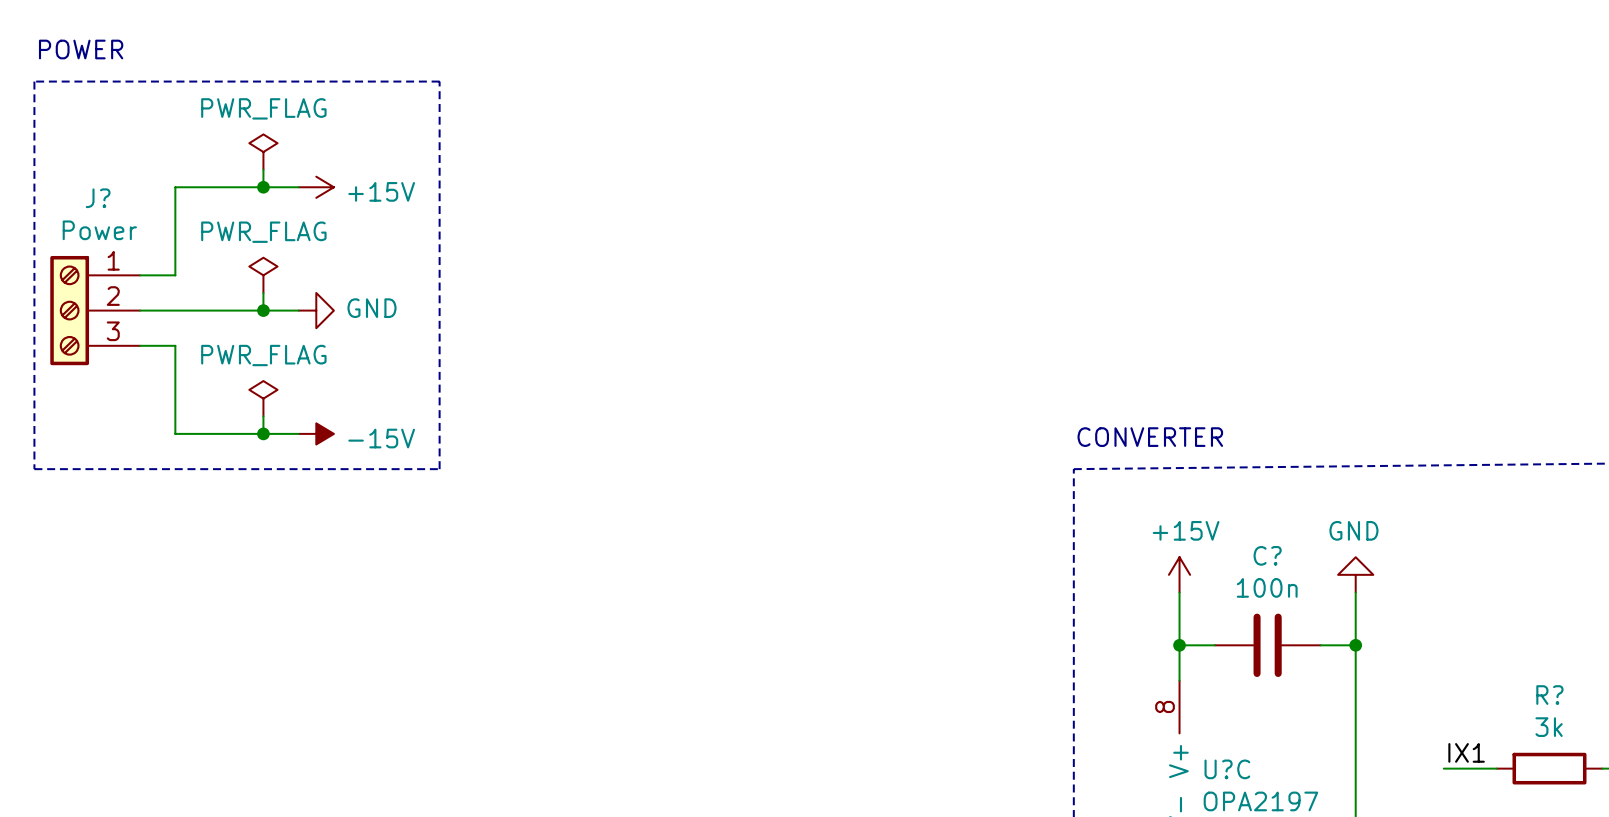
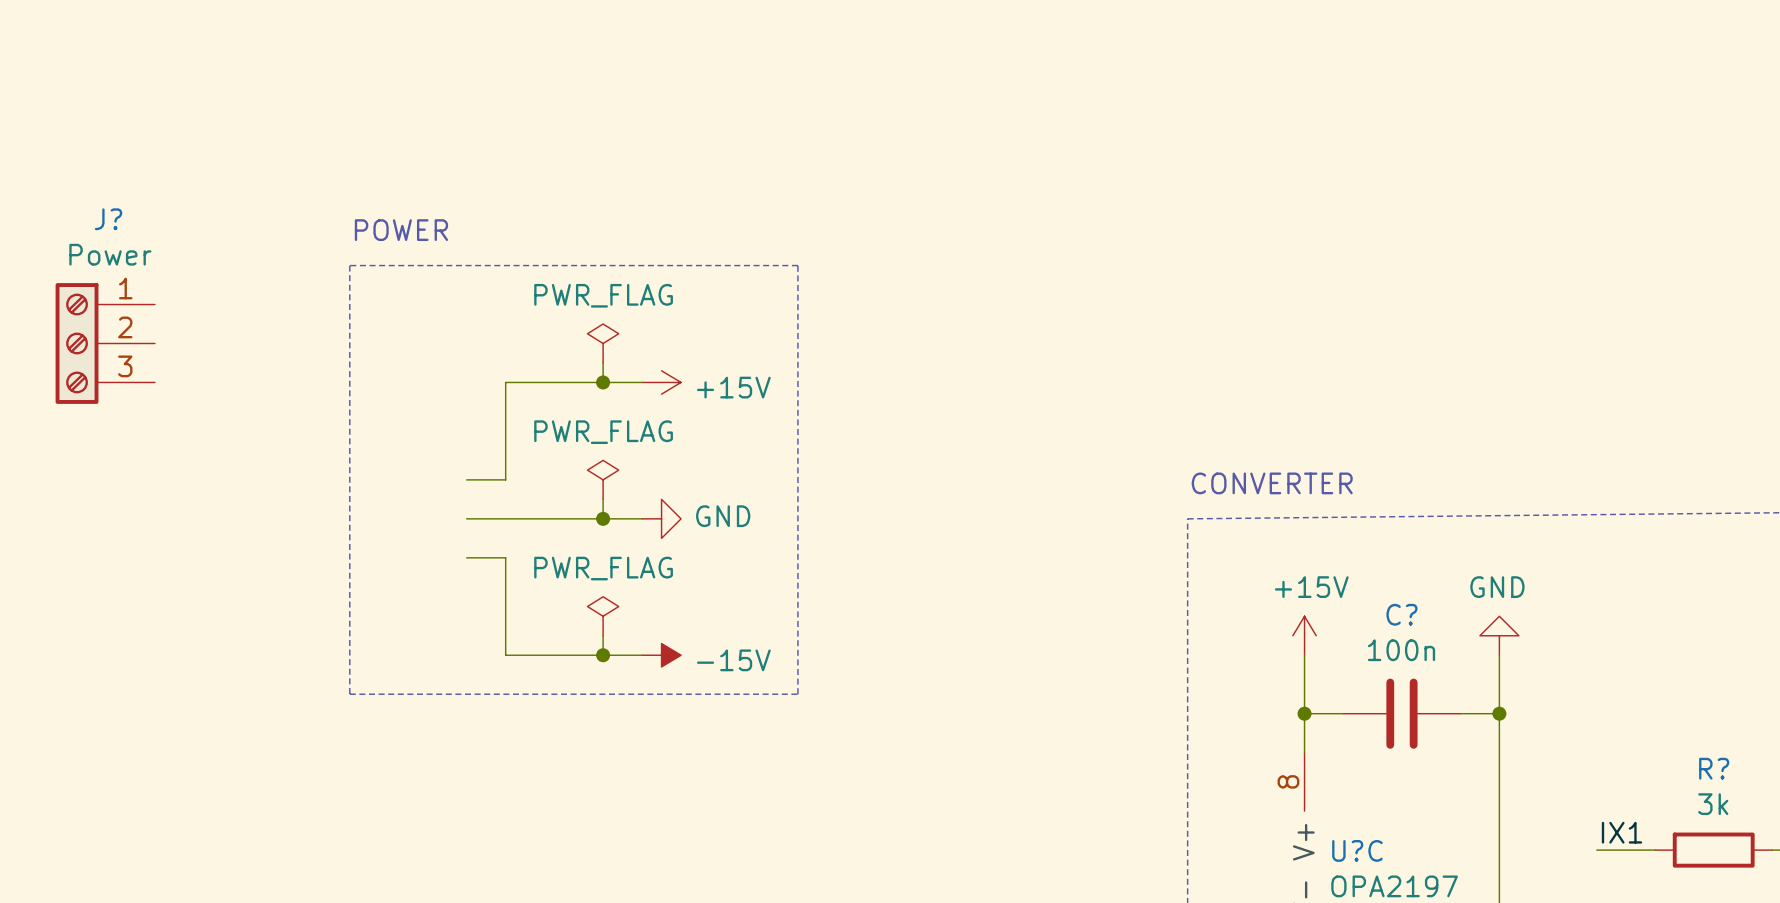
text position: POWER (81, 49) -> POWER (401, 230)
line: (34, 81) (34, 469) (439, 469) (439, 81) (34, 81) -> (349, 265) (349, 694) (797, 694) (797, 265) (349, 265)
power symbol: PWR_FLAG (263, 152) -> none
wire: (263, 169) (263, 187) -> (603, 362) (603, 382)
junction: (263, 187) -> none
wire: (298, 187) (175, 187) (175, 275) (140, 275) -> (642, 382) (505, 382) (505, 479) (466, 479)
power symbol position: +15V (316, 187) -> +15V (661, 382)
power symbol: PWR_FLAG (263, 275) -> none
wire: (263, 292) (263, 310) -> (603, 499) (603, 518)
wire: (140, 310) (298, 310) -> (466, 518) (642, 518)
junction: (263, 310) -> none
power symbol position: GND (316, 310) -> GND (661, 518)
power symbol: none -> PWR_FLAG (603, 343)
wire: (140, 345) (175, 345) (175, 433) (298, 433) -> (466, 557) (505, 557) (505, 655) (642, 655)
junction: none -> (603, 382)
power symbol: PWR_FLAG (263, 398) -> none
wire: (263, 416) (263, 433) -> (603, 635) (603, 655)
junction: (263, 433) -> none
power symbol position: -15V (316, 433) -> -15V (661, 655)
power symbol: none -> PWR_FLAG (603, 479)
junction: none -> (603, 518)
power symbol: none -> PWR_FLAG (603, 616)
junction: none -> (603, 655)

